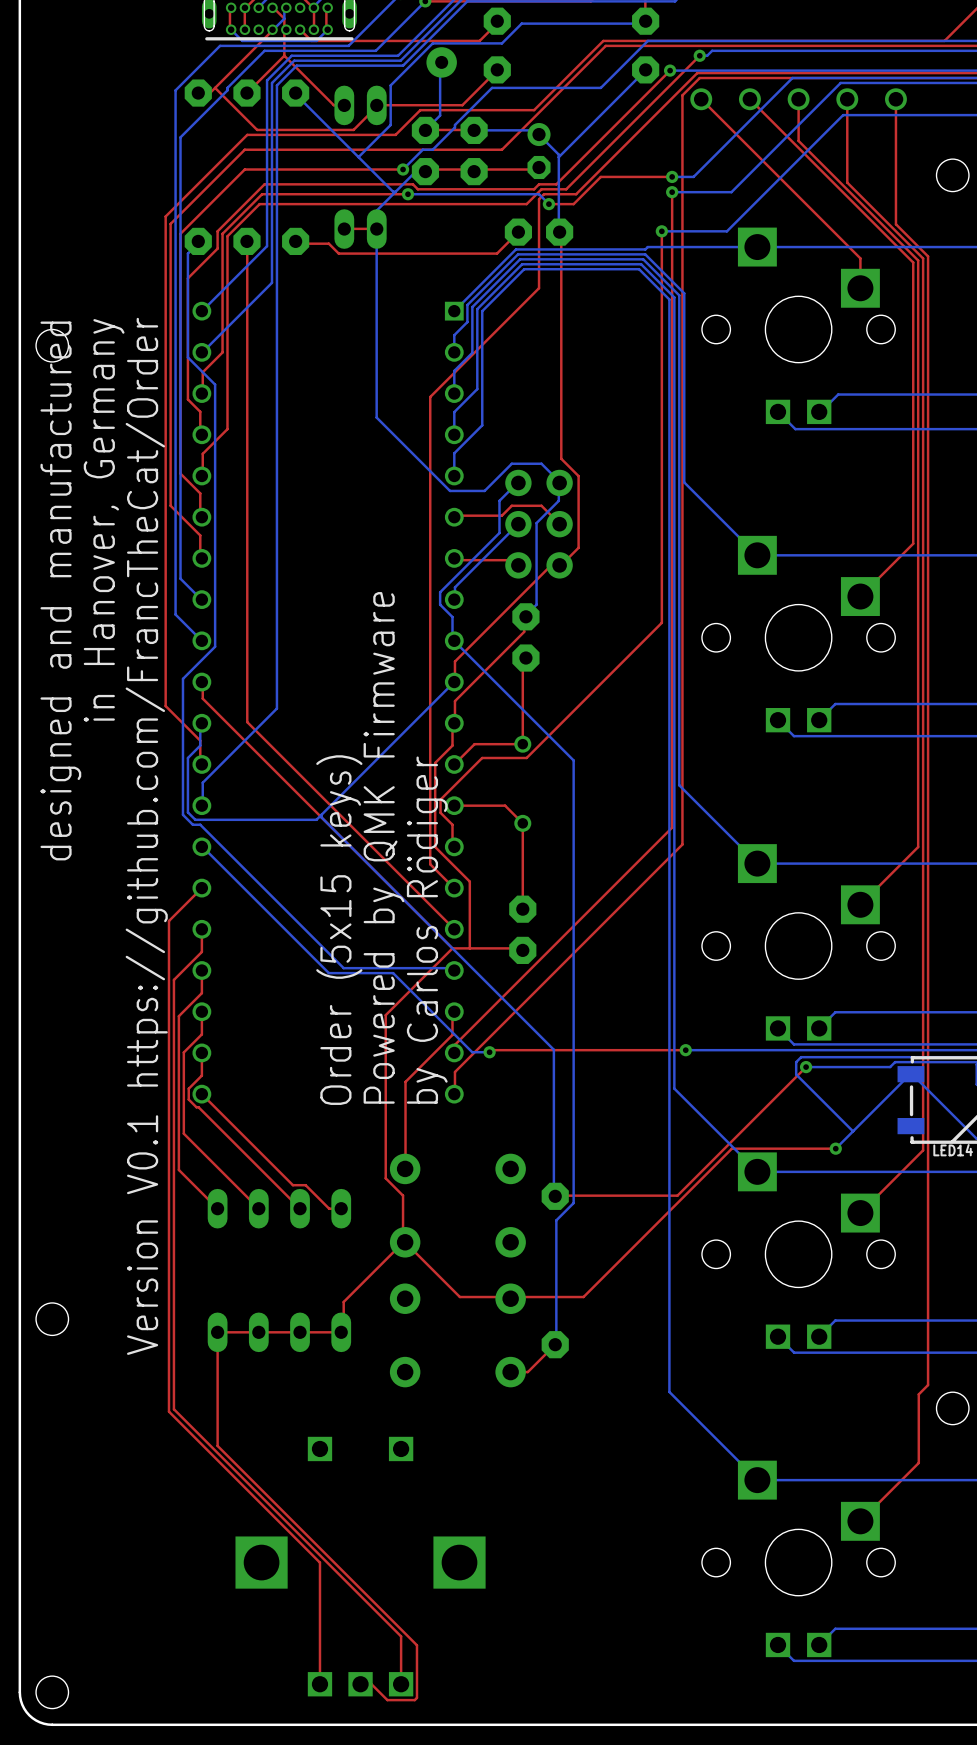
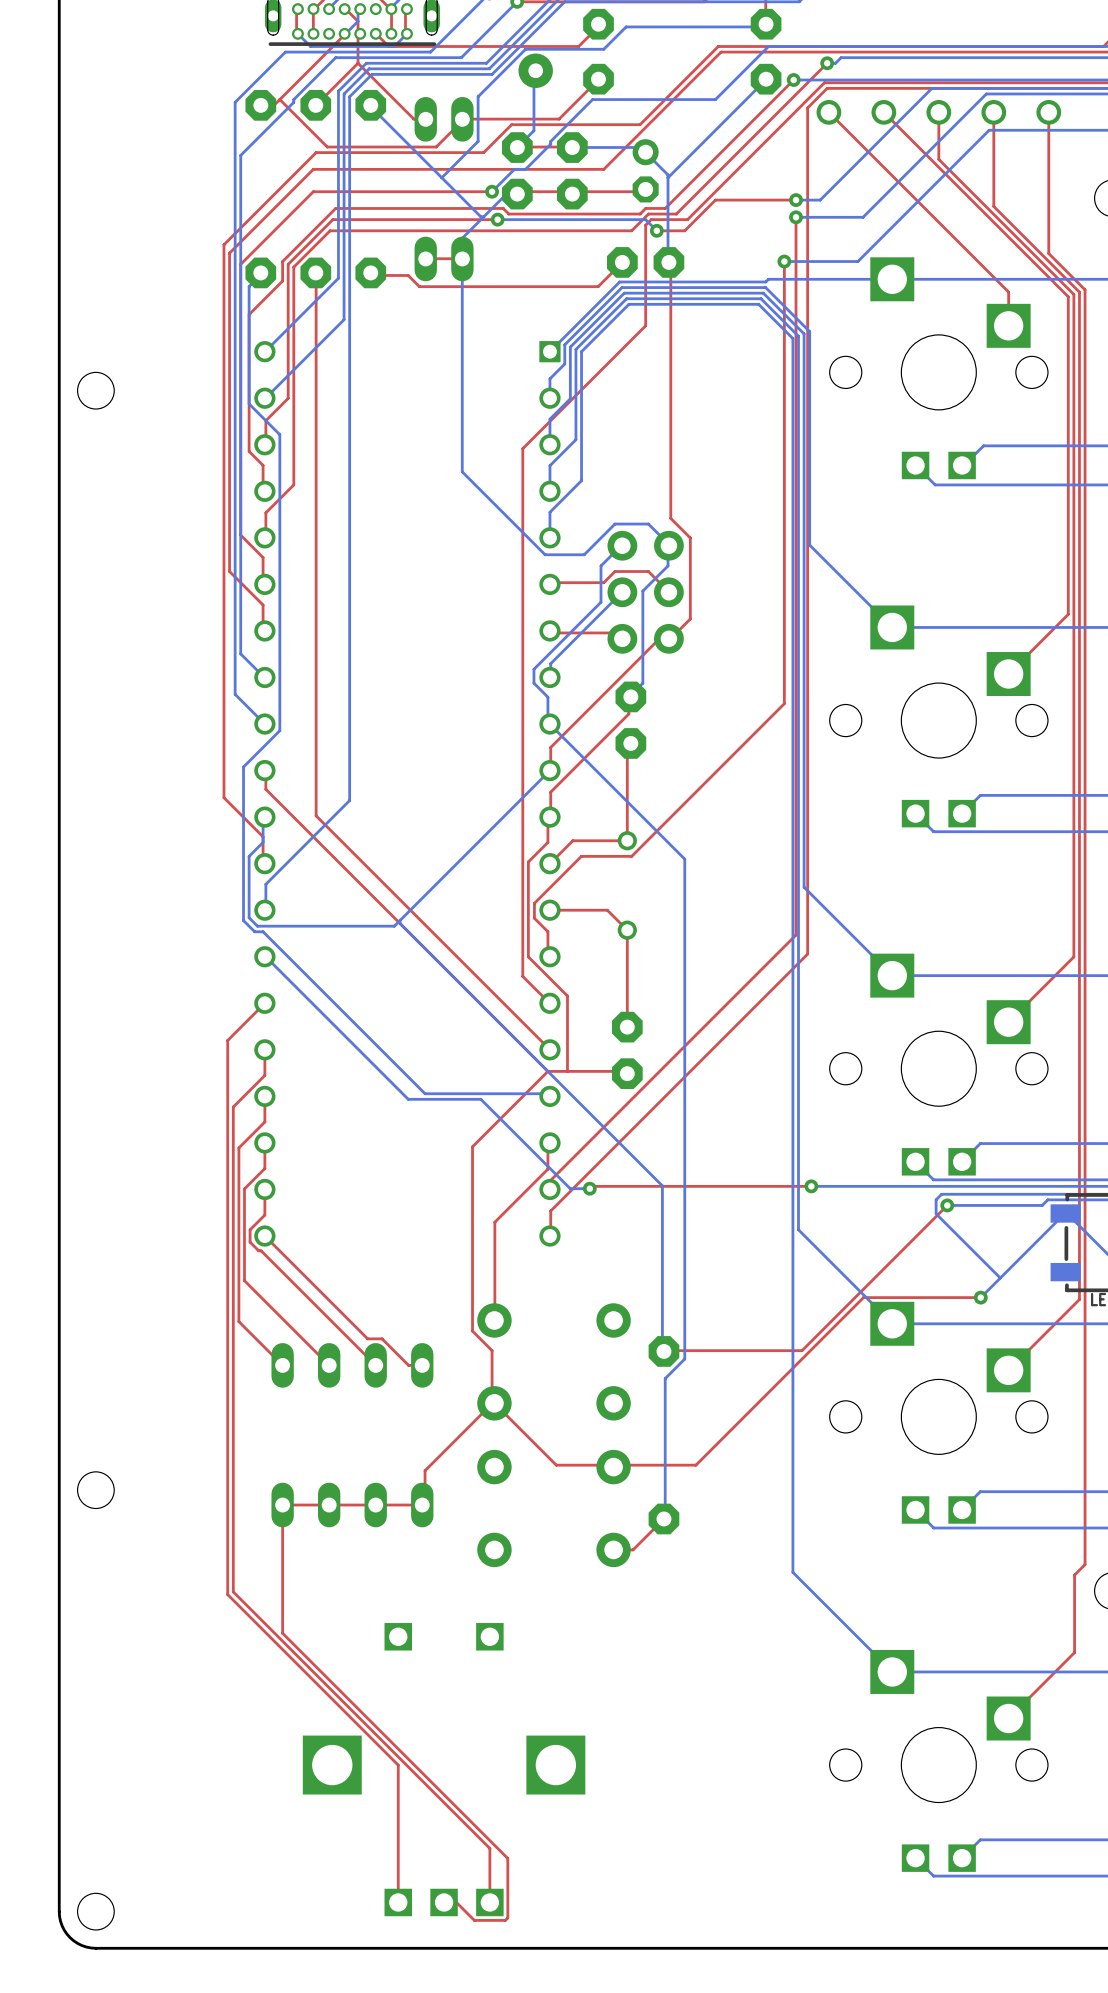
text: in Hanover, Germany (104, 520) -> none
text: designed and manufactured (60, 590) -> none
text: Version V0.1 https://github.com/FrancTheCat/Order (146, 836) -> none
text: Powered by QMK Firmware (383, 847) -> none
text: Order (5x15 keys) (339, 930) -> none
text: by Carlos Rödiger (427, 930) -> none

